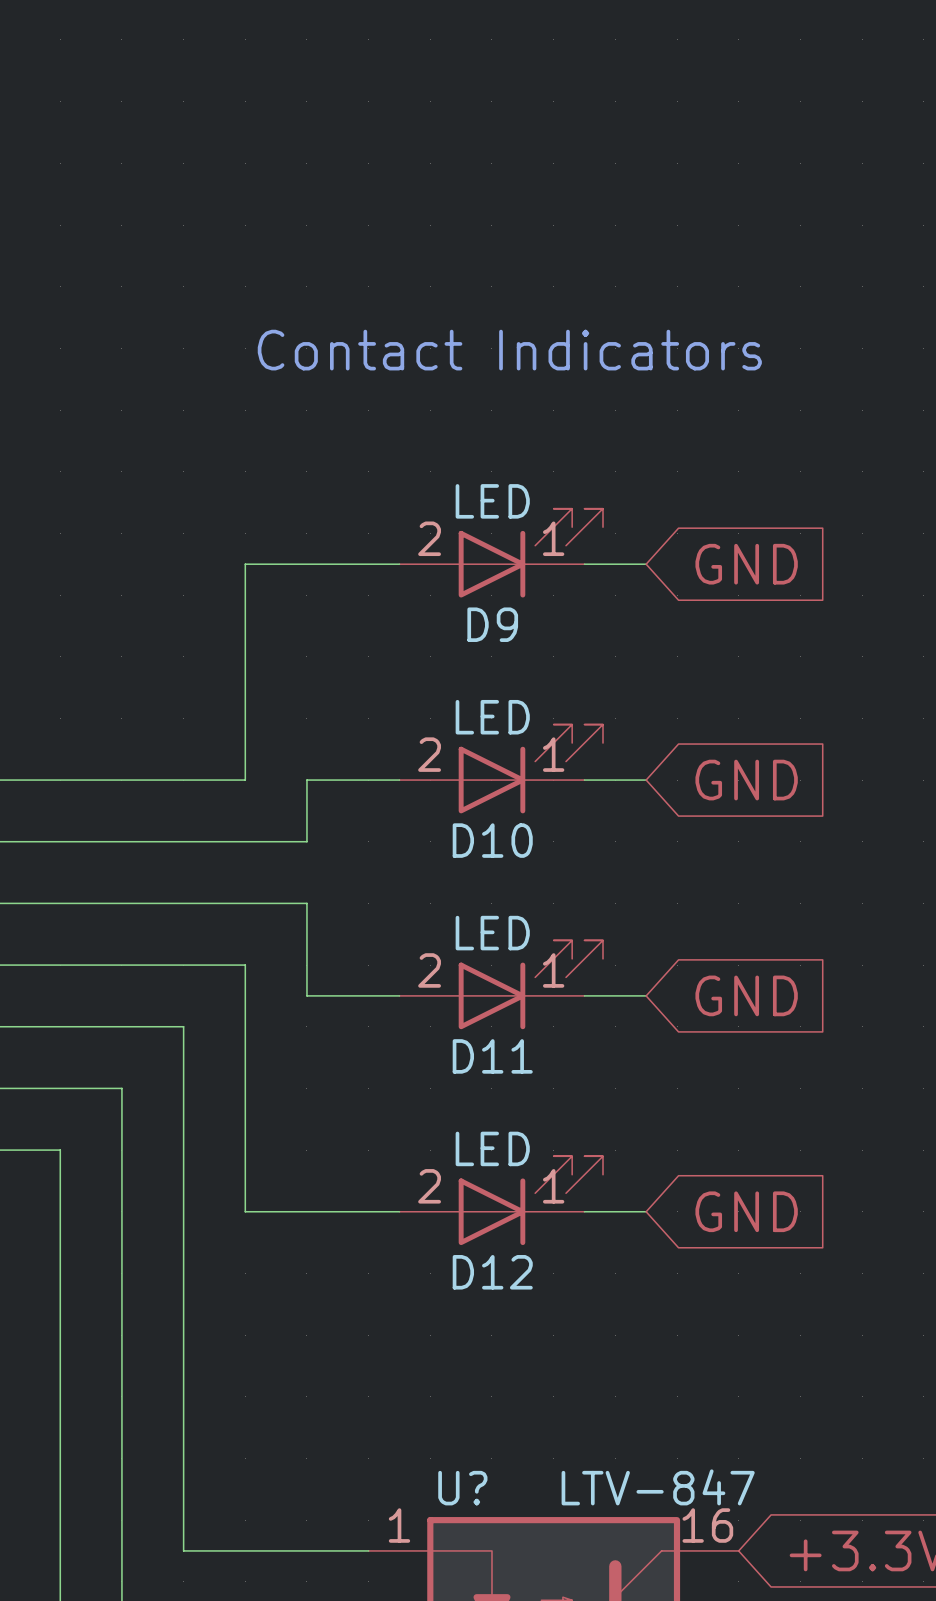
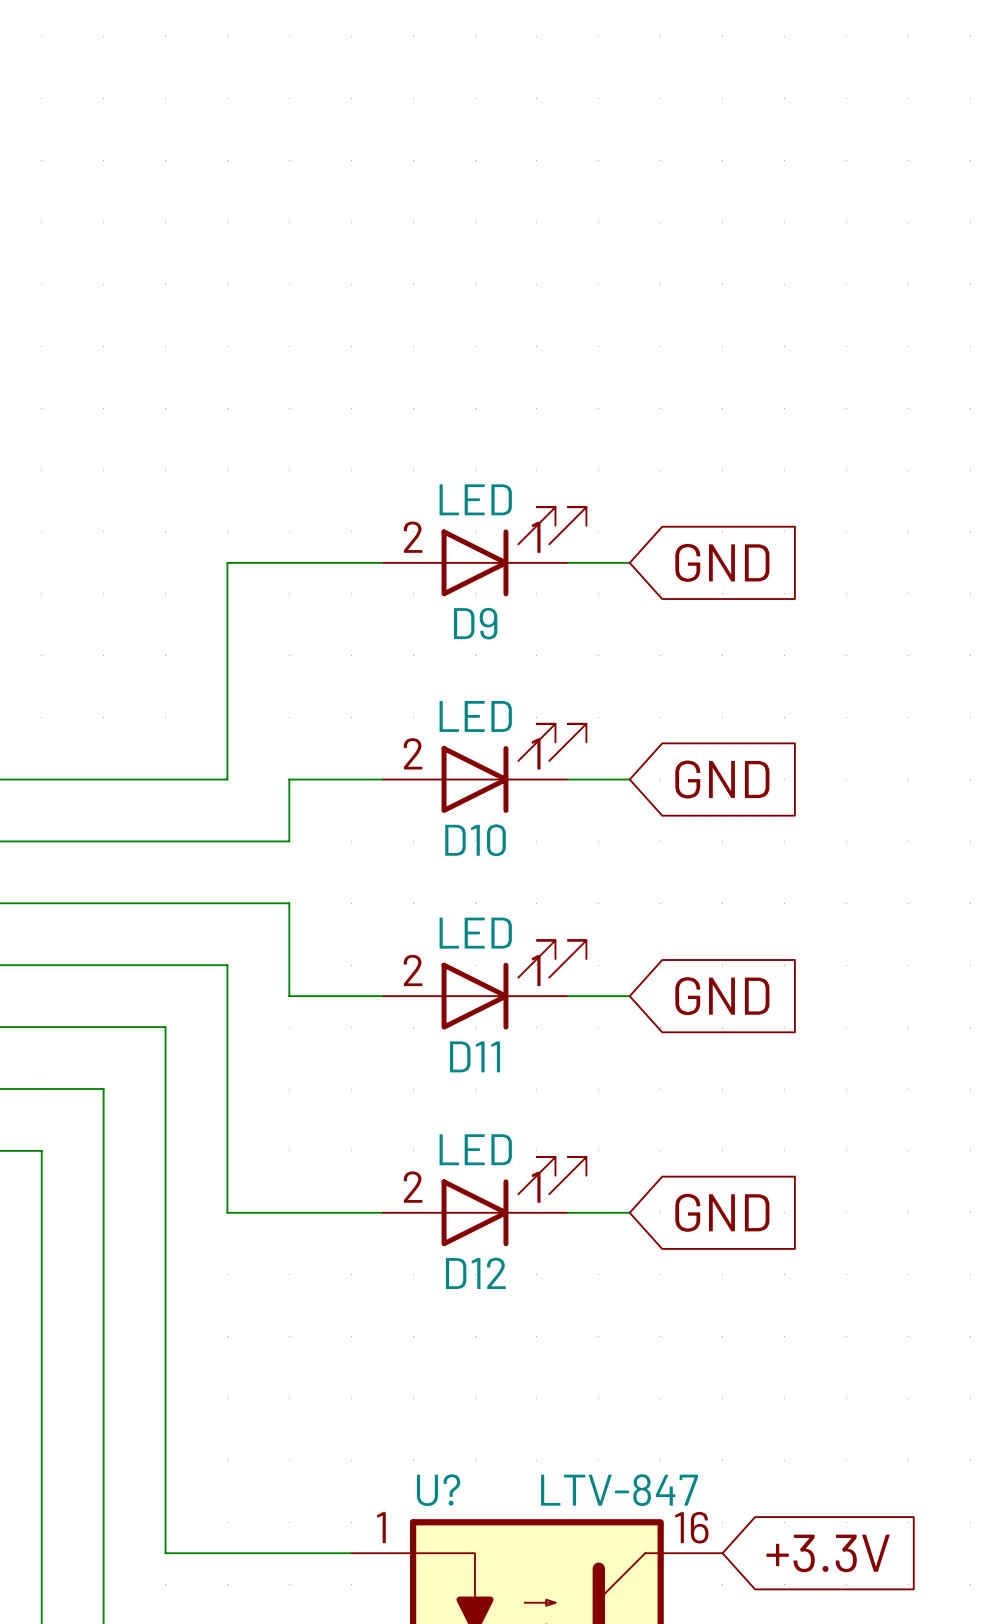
text: Contact Indicators (509, 350) -> none

